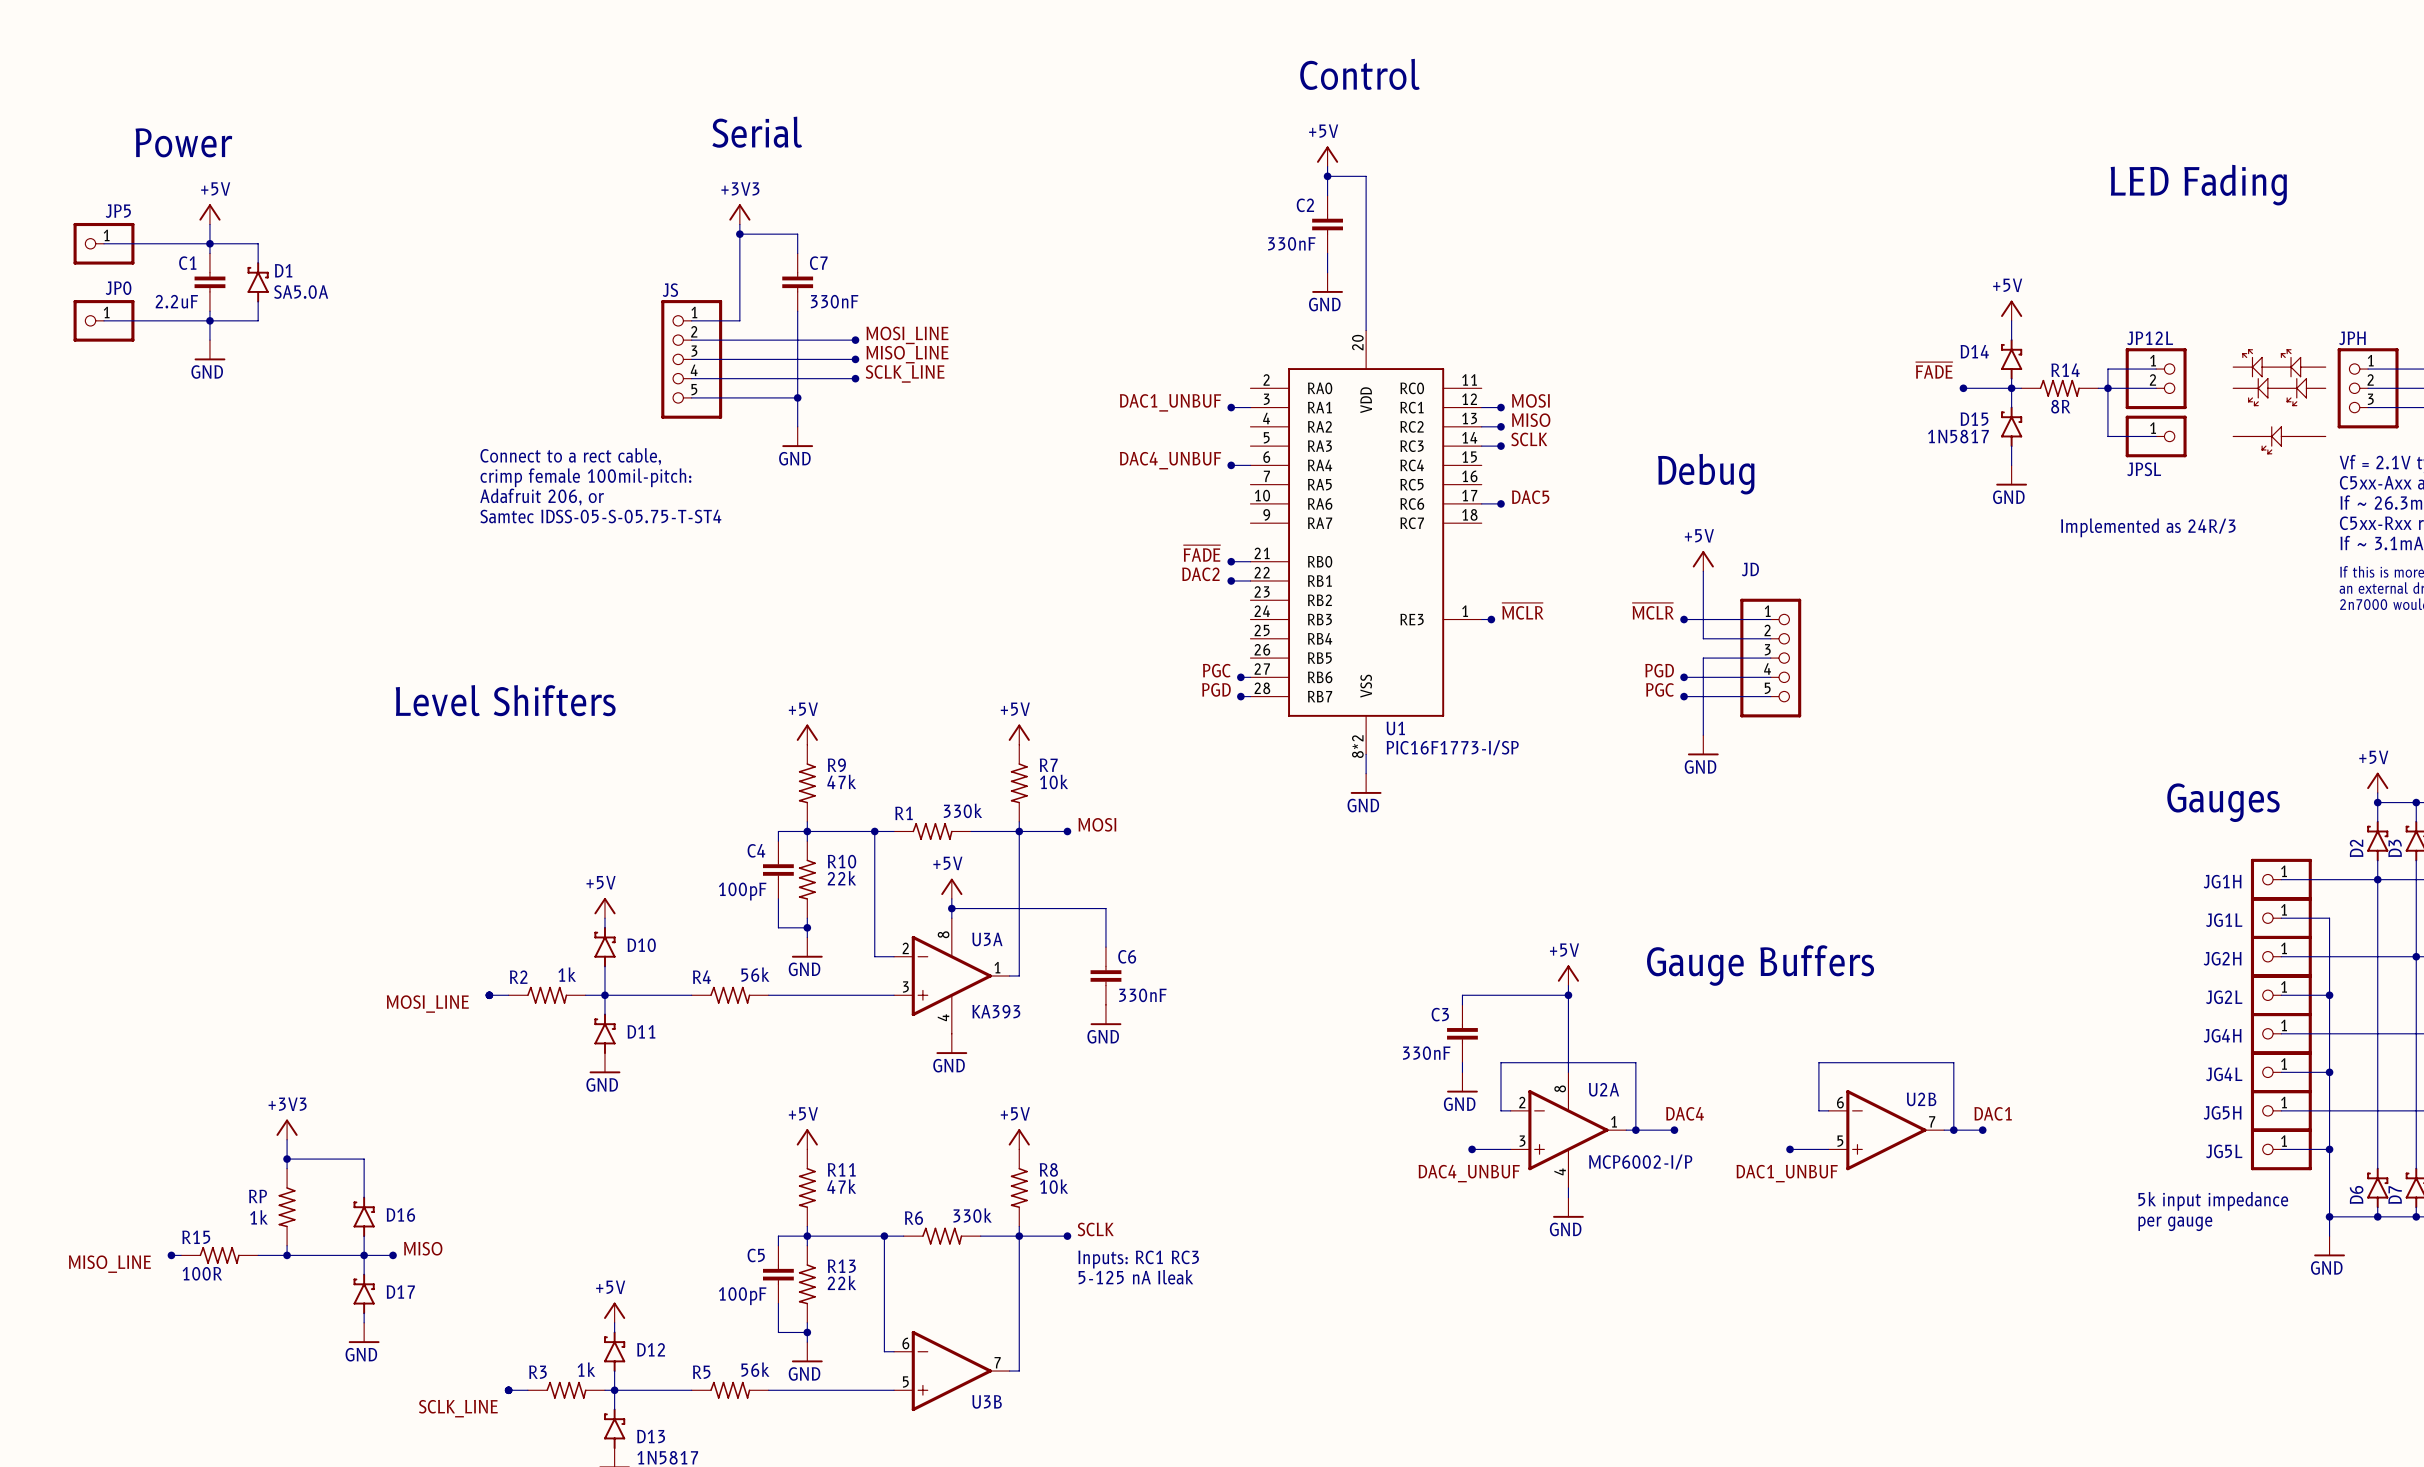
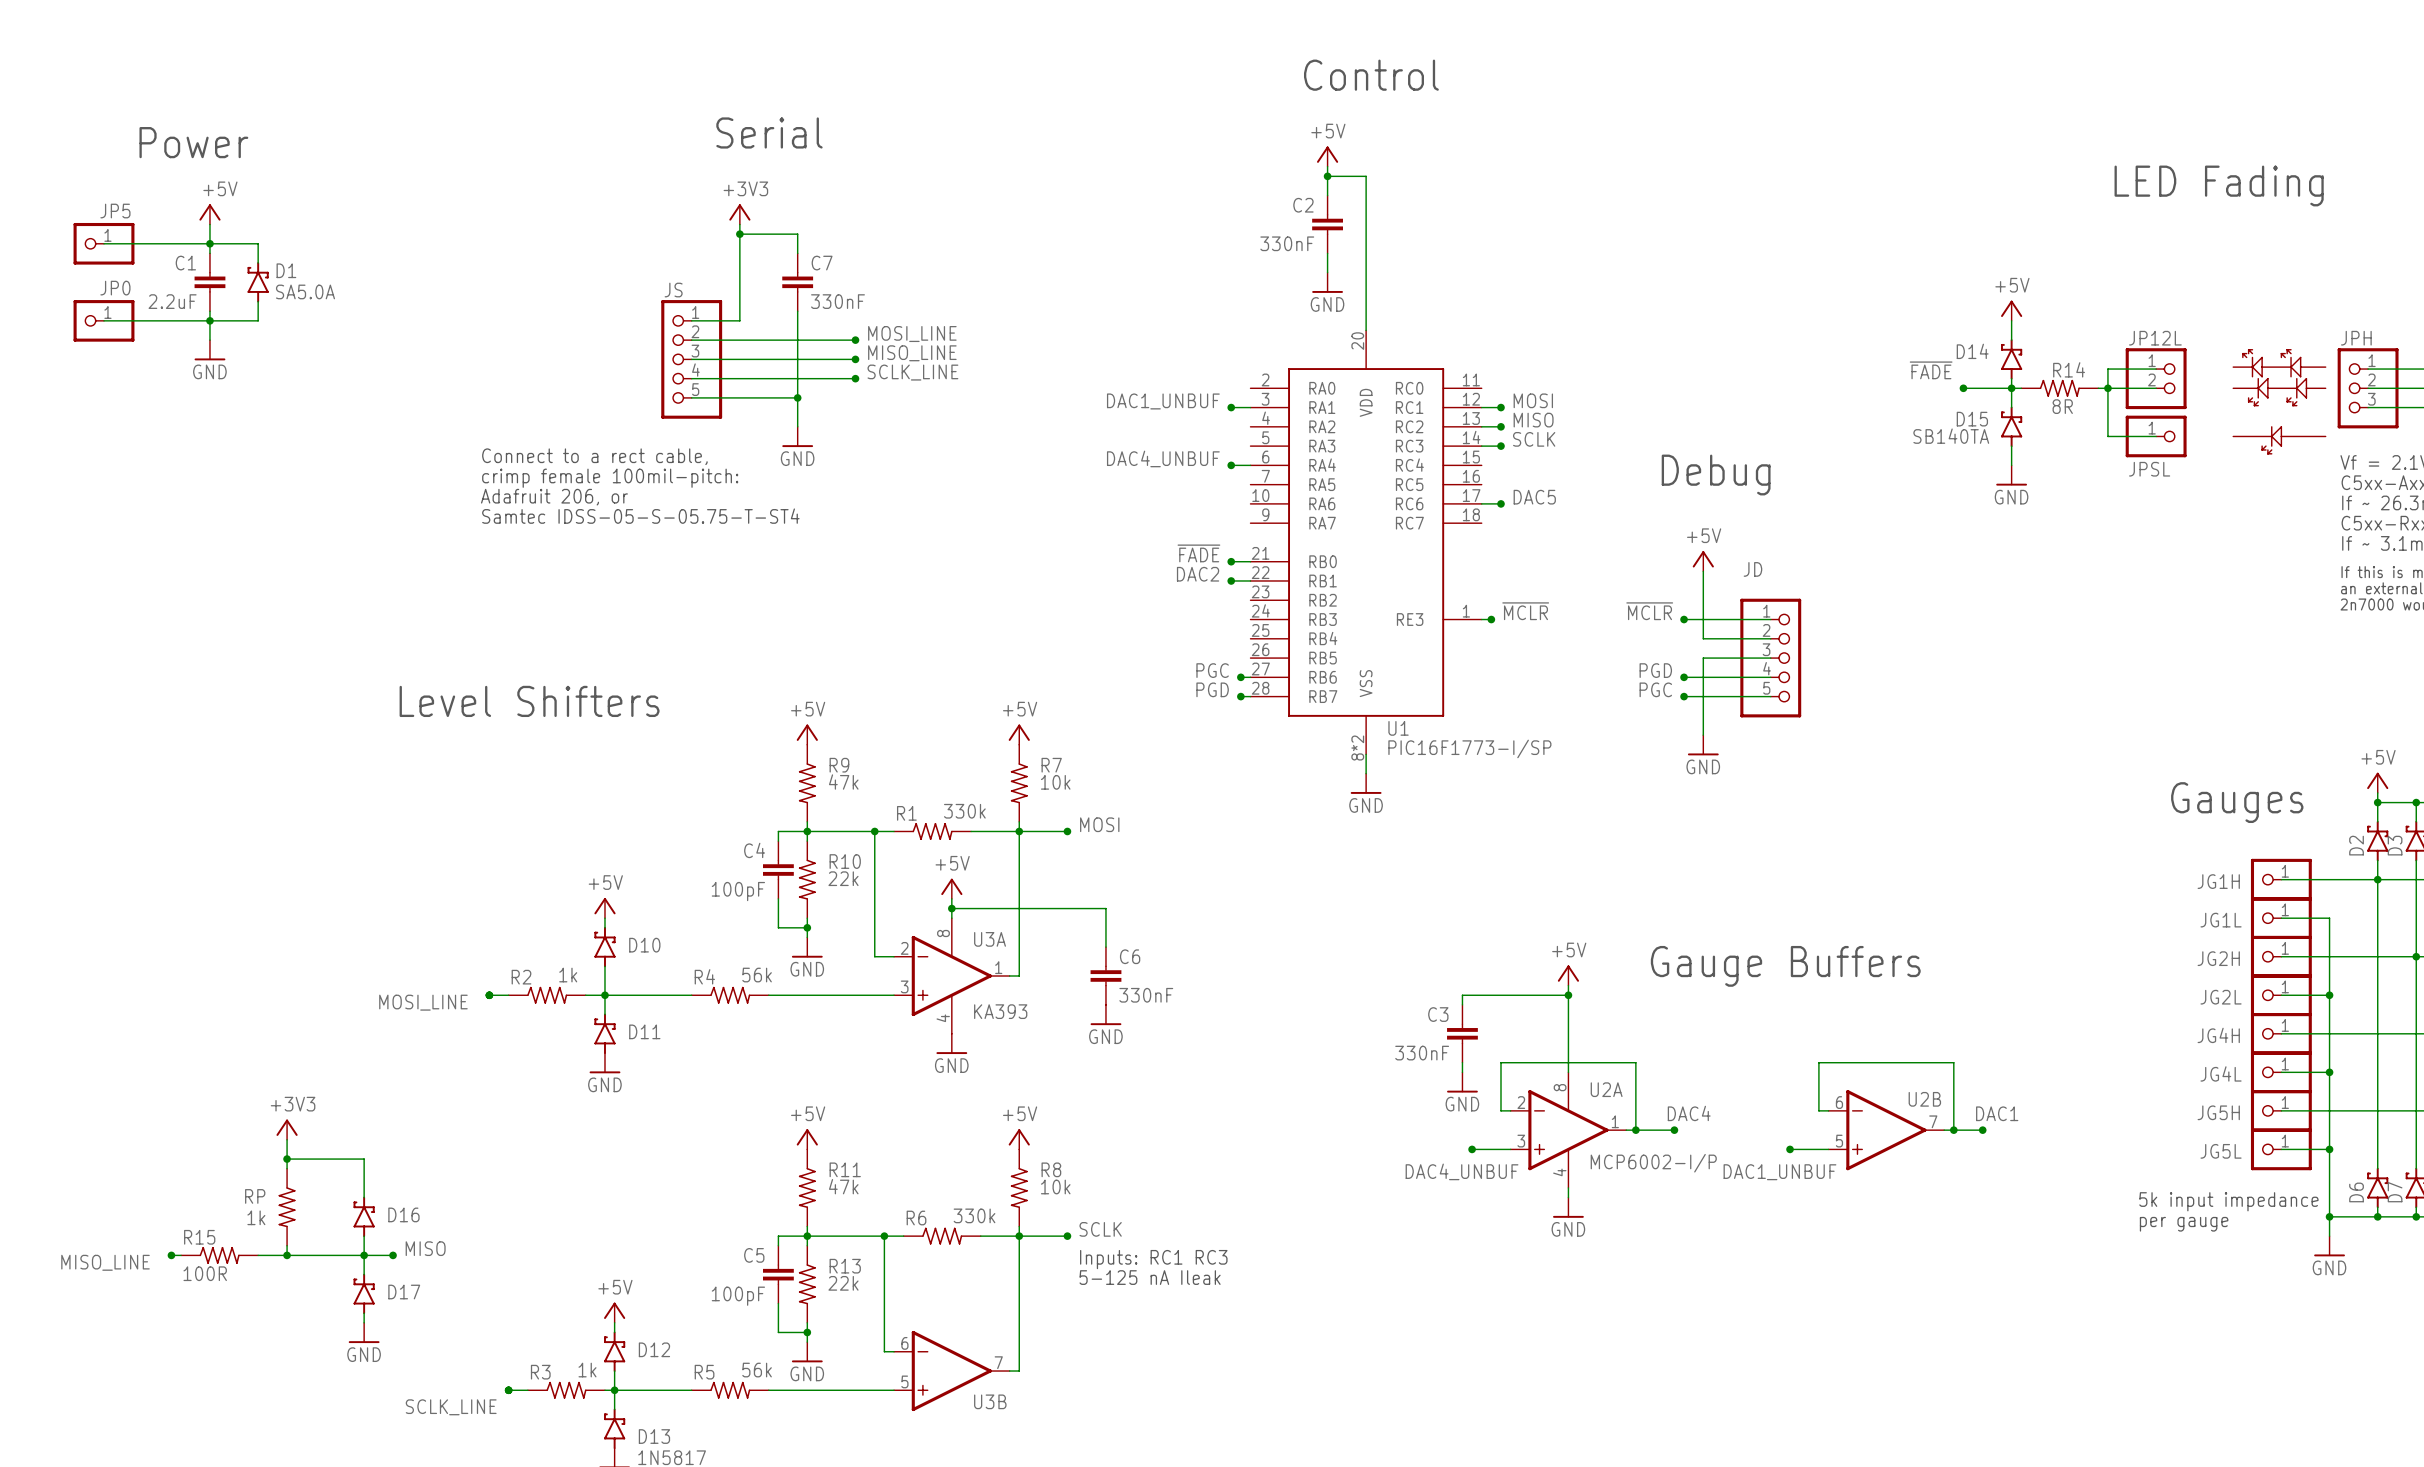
D15 value: 1N5817 (1958, 436) -> SB140TA (1951, 436)
text: Implemented as 24R/3 (2148, 527) -> none

